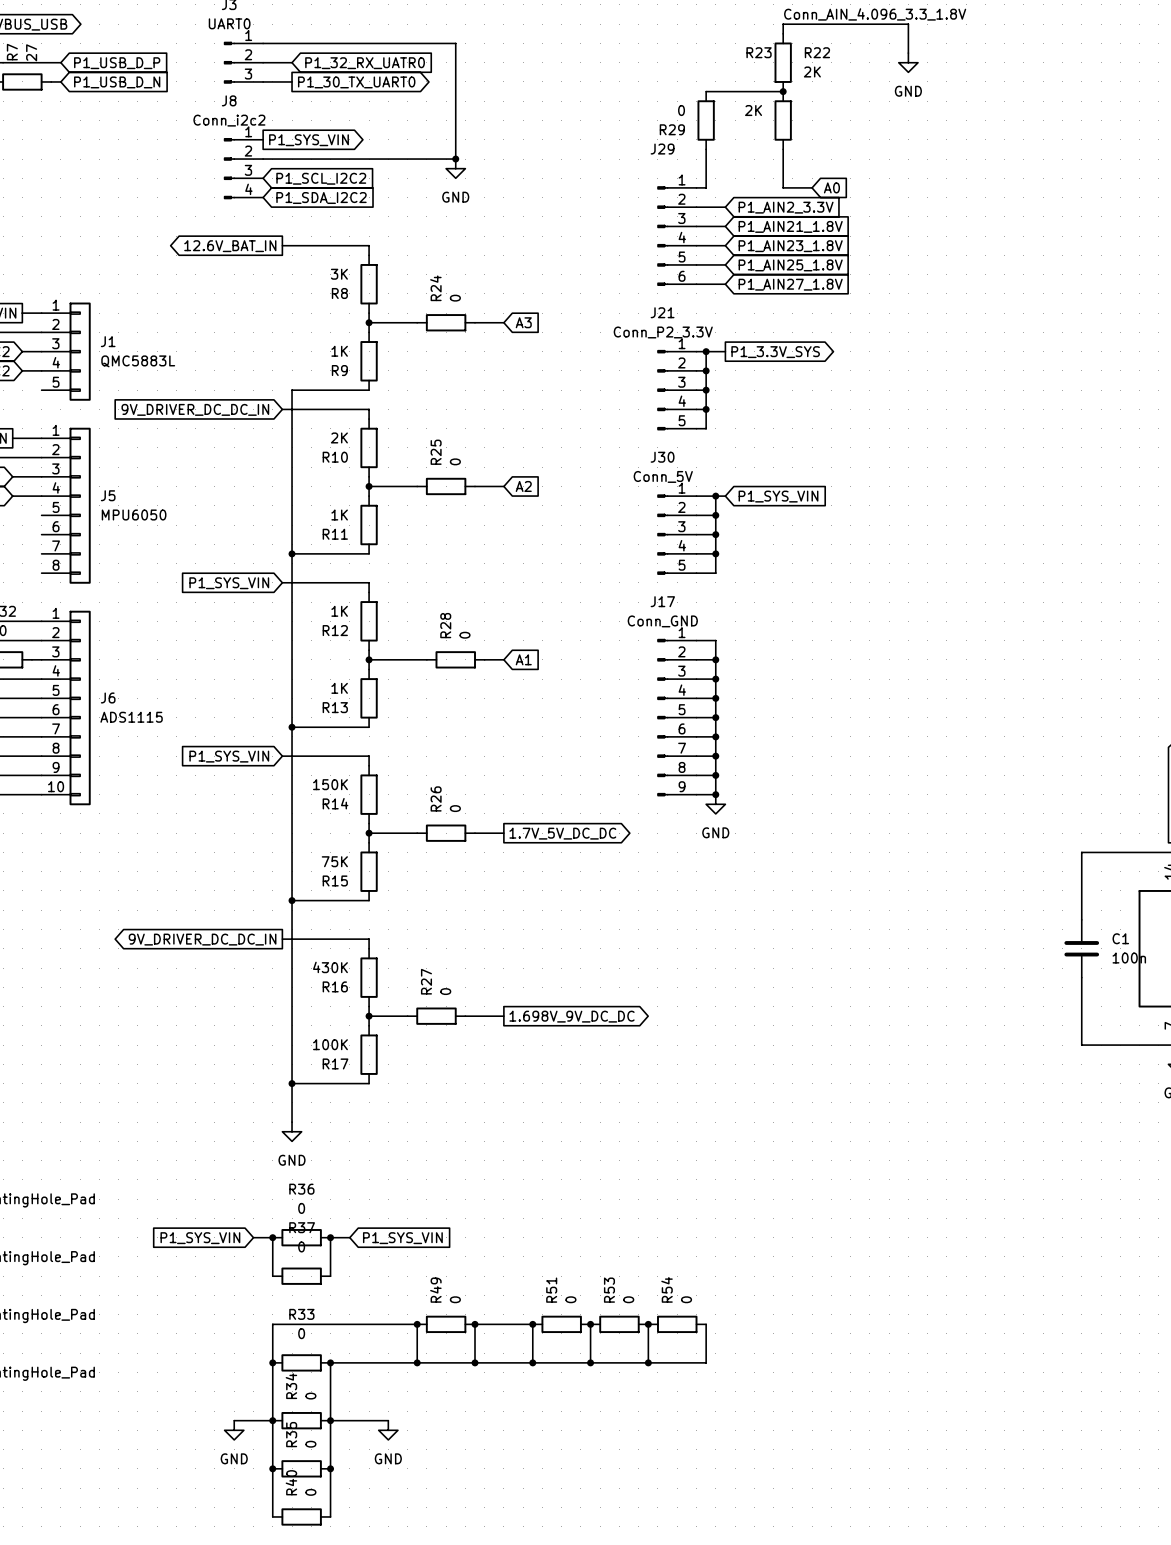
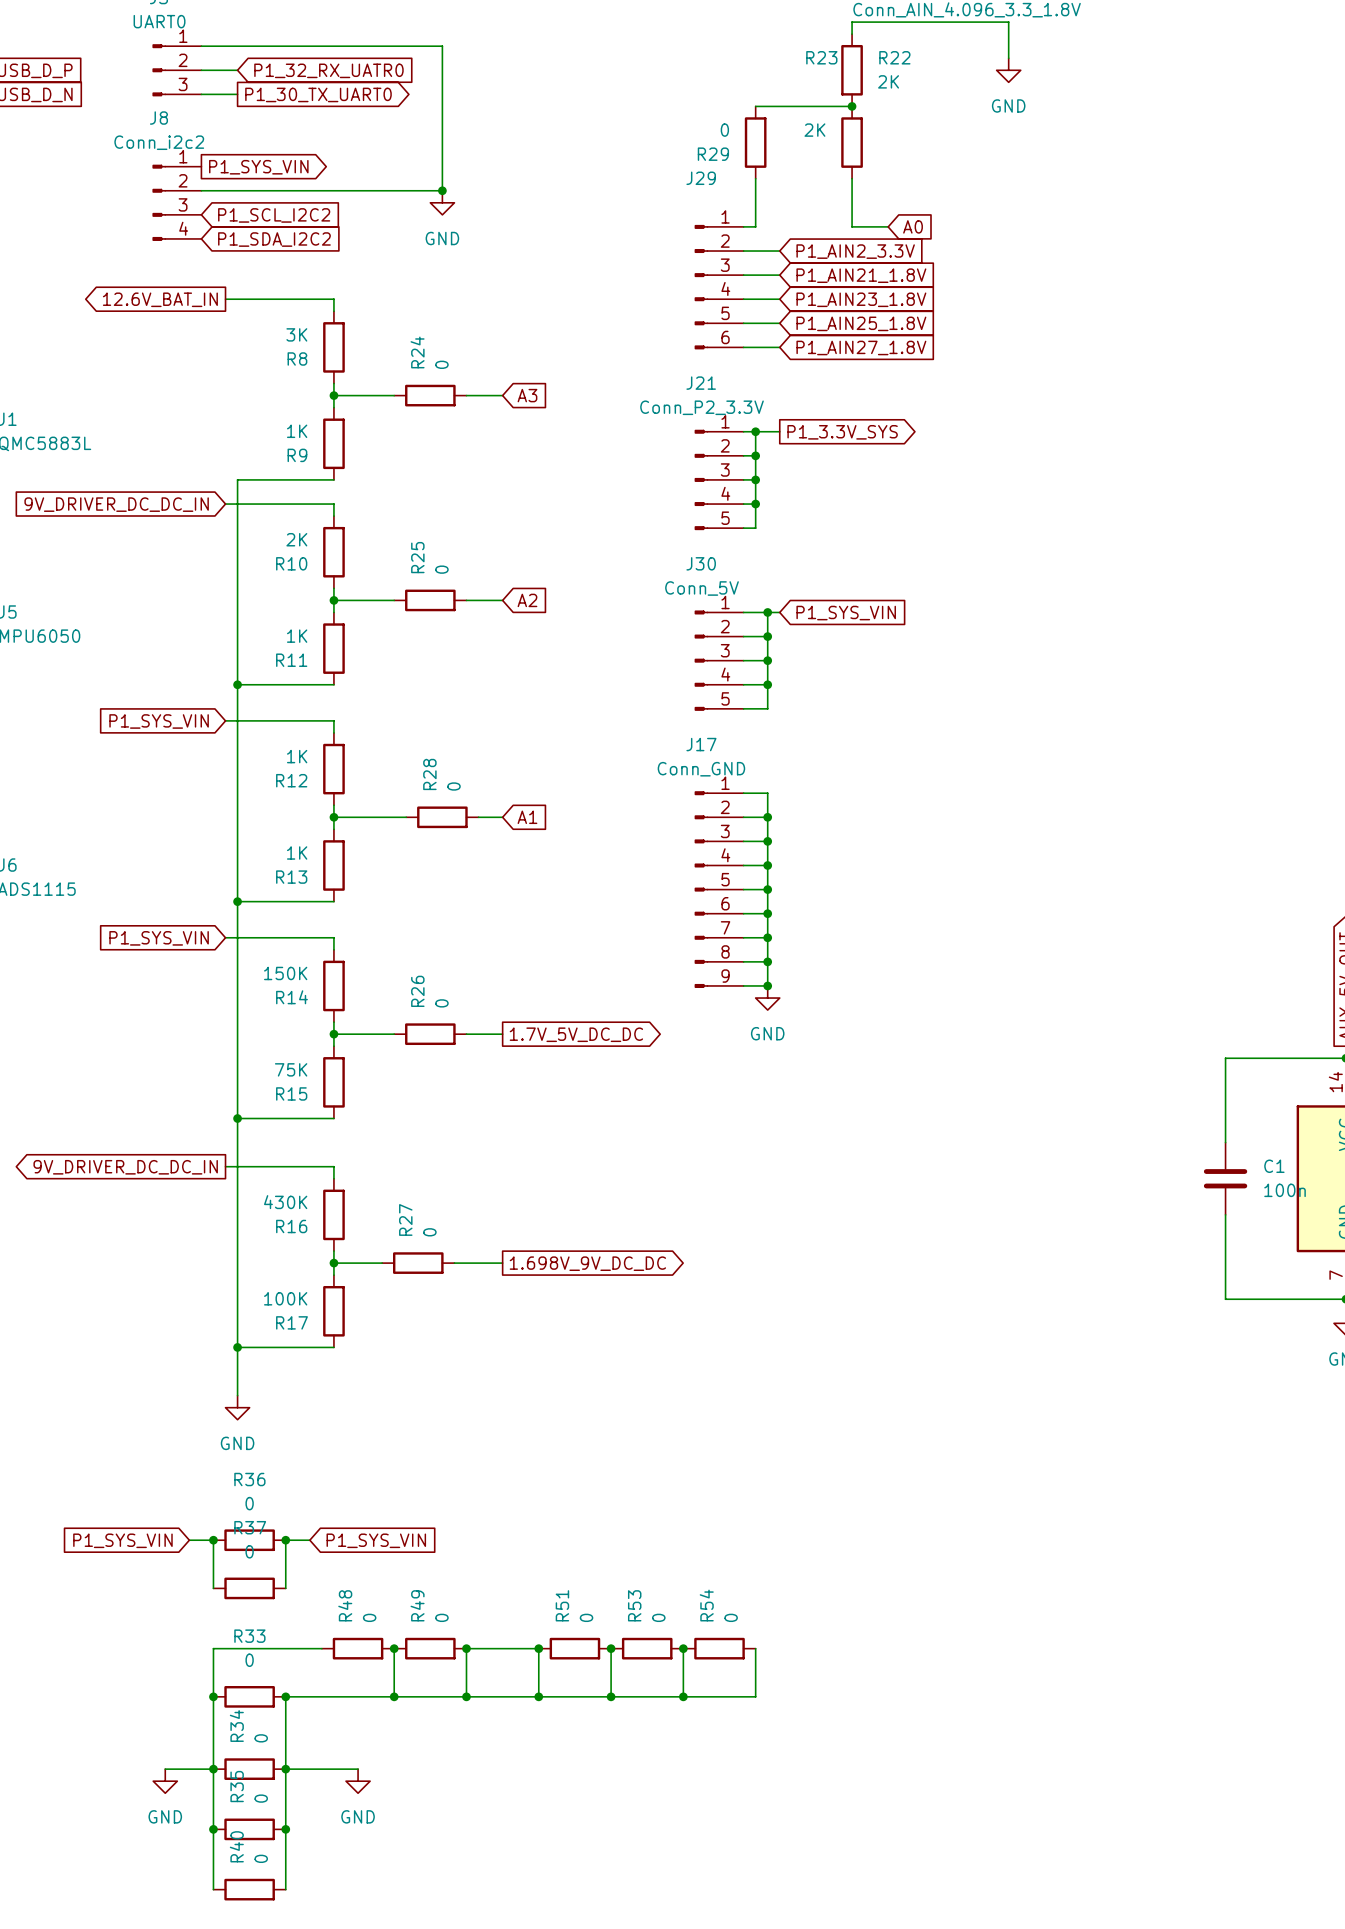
wire: (359, 1324) (417, 1324) -> none
R48: none -> 0 (358, 1648)

